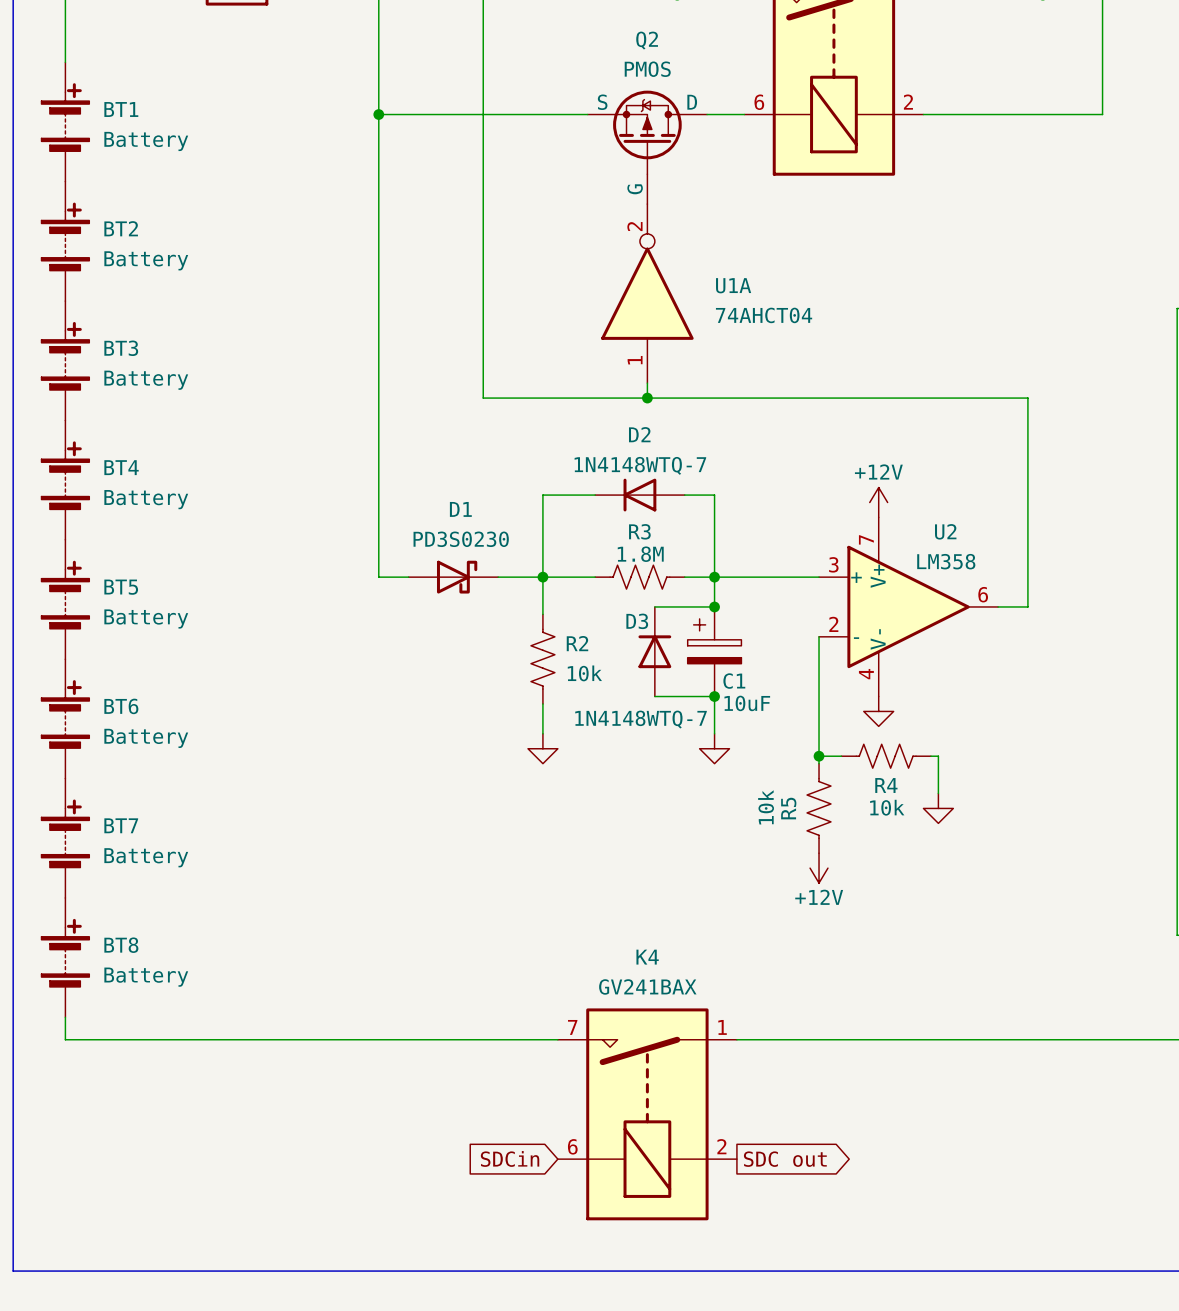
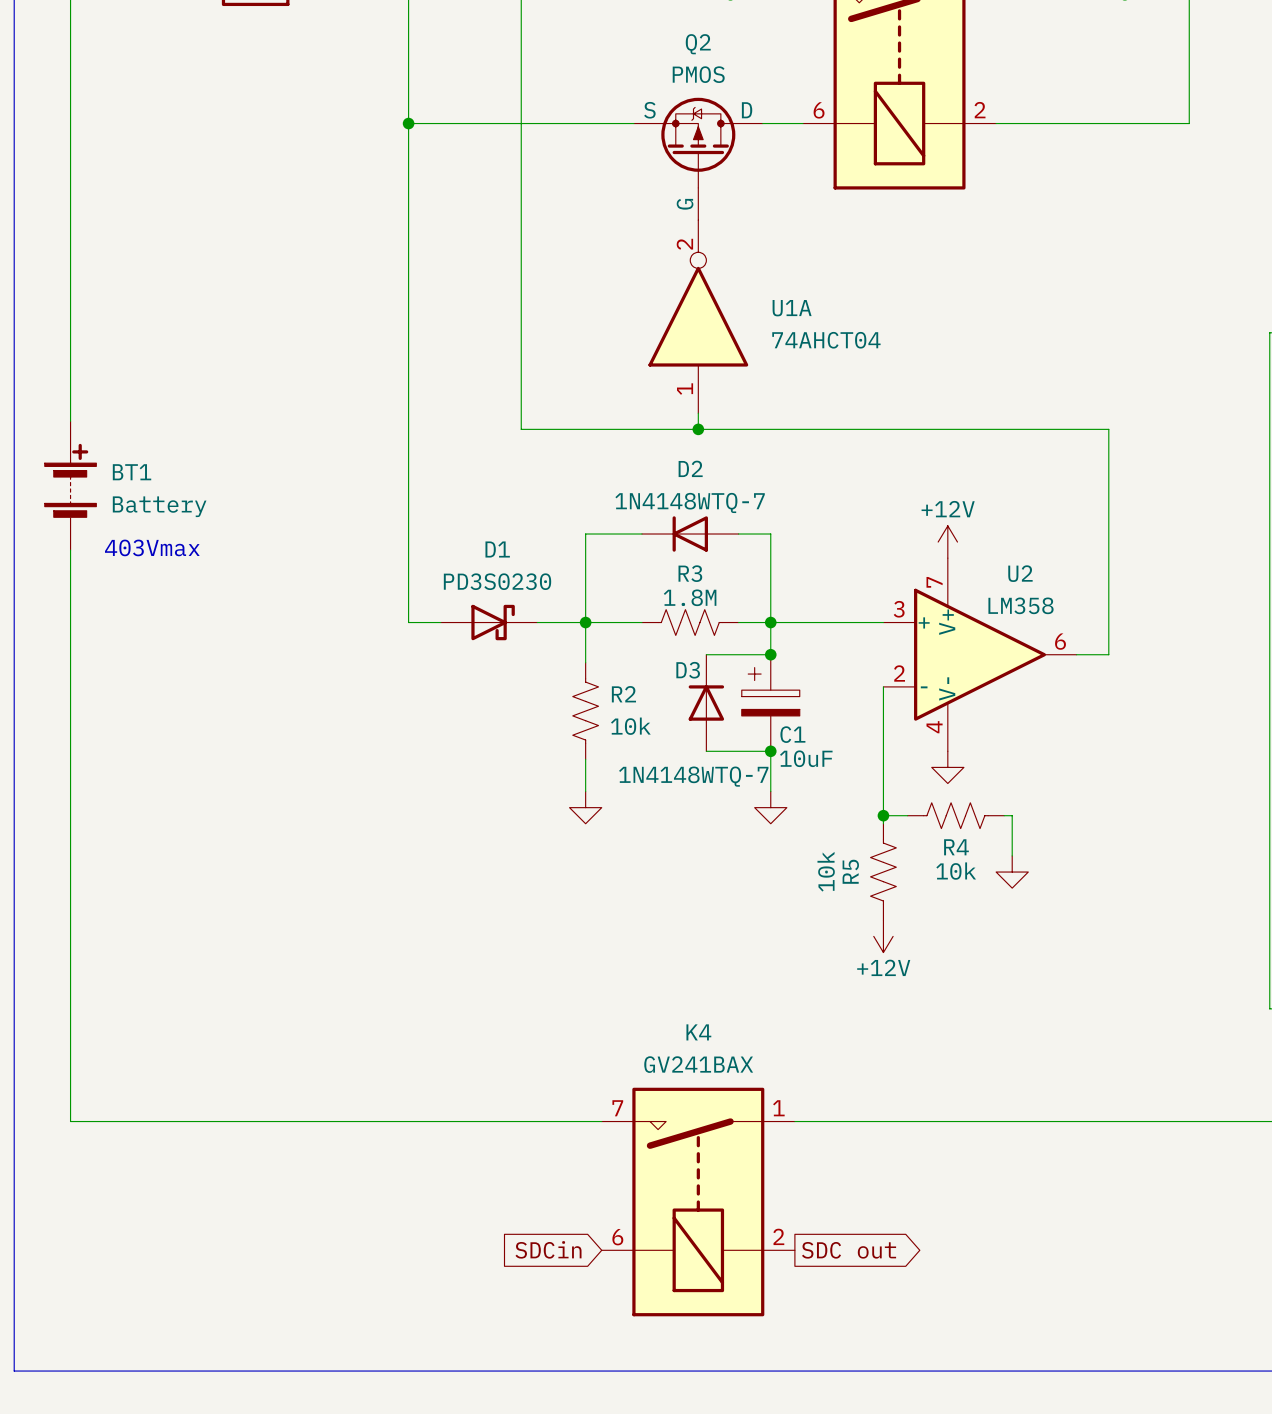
BT1 position: (65, 121) -> (70, 485)
BT2: Battery (65, 241) -> none
BT3: Battery (65, 360) -> none
BT4: Battery (65, 480) -> none
text: none -> 403Vmax (152, 547)
BT5: Battery (65, 599) -> none
BT6: Battery (65, 718) -> none
BT7: Battery (65, 838) -> none
BT8: Battery (65, 957) -> none

